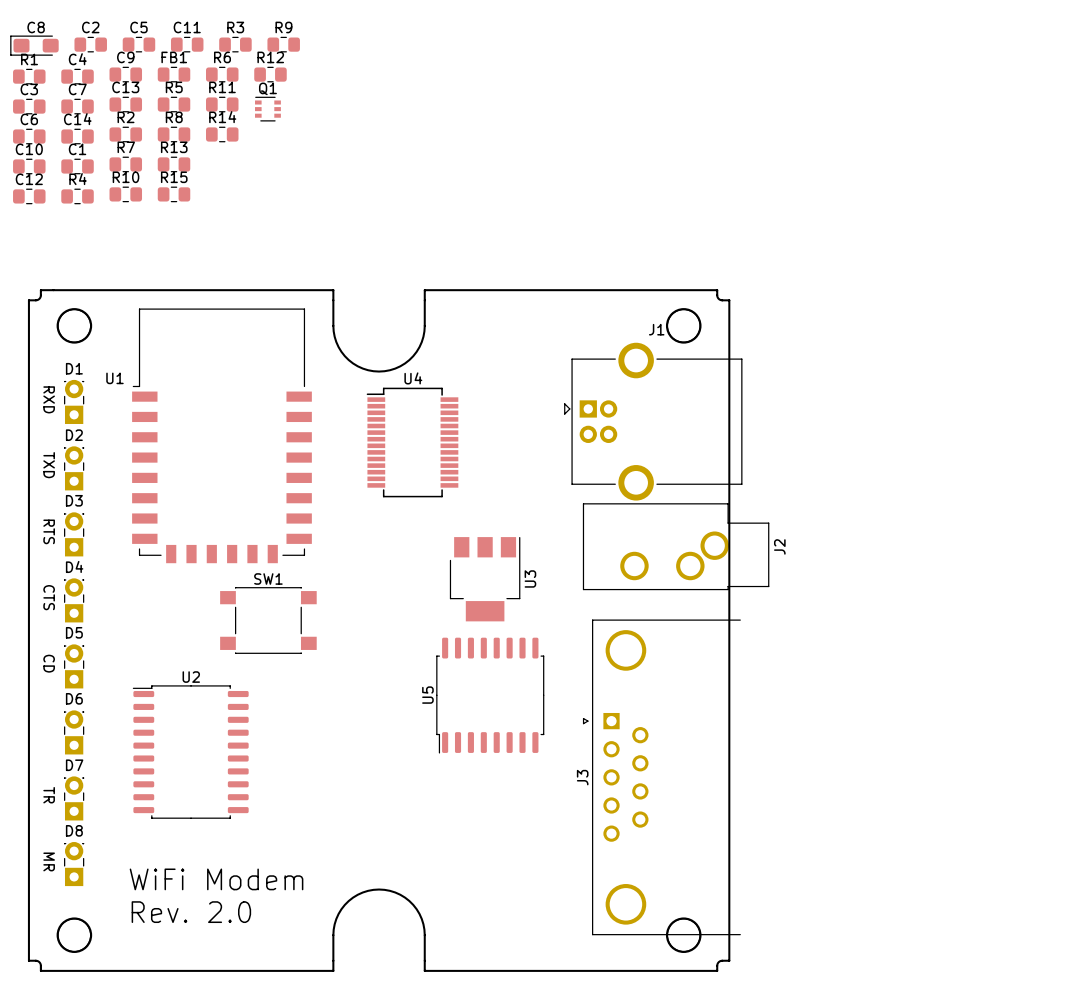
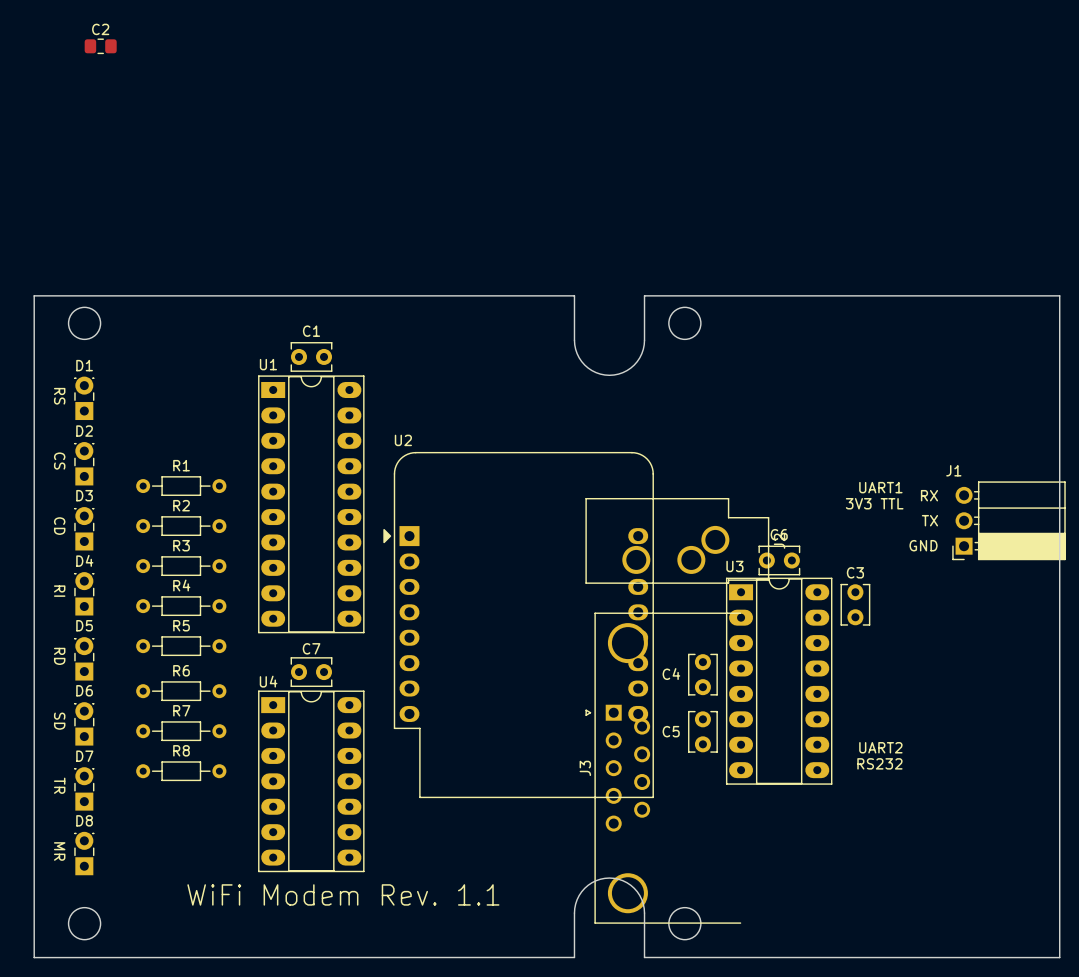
C5 name position: C5 (138, 27) -> C5 (671, 731)
C5 footprint: [122, 36, 156, 53] -> [688, 711, 718, 753]
R3 footprint: [219, 36, 252, 53] -> [136, 556, 227, 576]
C11: (187, 44) -> none
R9: (283, 44) -> none
C8: (34, 45) -> none
C4 name position: C4 (77, 59) -> C4 (671, 674)
R6 footprint: [206, 66, 239, 83] -> [136, 681, 227, 701]
R1 footprint: [13, 68, 46, 85] -> [136, 476, 227, 496]
C4 footprint: [61, 68, 94, 85] -> [688, 653, 718, 696]
C9: (125, 74) -> none
FB1: (174, 74) -> none
R12: (270, 74) -> none
R5 footprint: [157, 96, 191, 113] -> [136, 636, 227, 656]
C3 footprint: [13, 98, 46, 115] -> [840, 583, 871, 626]
C7 footprint: [61, 98, 94, 115] -> [290, 657, 333, 687]
C13: (125, 104) -> none
R11: (222, 104) -> none
Q1: (267, 109) -> none
R2 footprint: [109, 126, 143, 143] -> [136, 516, 227, 536]
R8 footprint: [157, 126, 191, 143] -> [136, 761, 227, 782]
C6 footprint: [13, 128, 46, 145] -> [758, 545, 801, 576]
R14: (222, 134) -> none
C14: (77, 136) -> none
R7 footprint: [109, 156, 143, 173] -> [136, 721, 227, 741]
C1 footprint: [61, 158, 94, 175] -> [290, 342, 333, 372]
R13: (174, 164) -> none
C10: (29, 166) -> none
R4 footprint: [61, 188, 94, 205] -> [136, 596, 227, 616]
R10: (125, 194) -> none
R15: (174, 194) -> none
C12: (29, 196) -> none
board edge: (40, 290) (333, 290) (333, 331) (338, 347) (344, 356) (357, 366) (379, 371) (400, 366) (409, 360) (419, 347) (424, 331) (424, 290) (717, 290) (719, 299) (729, 300) (729, 960) (719, 961) (717, 970) (424, 970) (424, 929) (419, 913) (405, 897) (389, 890) (379, 889) (362, 892) (353, 897) (338, 913) (333, 929) (333, 970) (40, 970) (38, 961) (28, 960) (28, 300) (38, 299) (40, 290) -> (34, 295) (34, 957) (574, 957) (574, 913) (577, 899) (588, 885) (600, 879) (609, 878) (627, 882) (634, 888) (641, 899) (644, 913) (644, 957) (1059, 957) (1059, 295) (644, 295) (644, 340) (641, 353) (634, 365) (627, 370) (609, 375) (596, 372) (588, 368) (577, 353) (574, 340) (574, 295) (34, 295)
round board edge: [56, 308, 93, 344] -> none
U1 footprint: [132, 308, 312, 564] -> [258, 375, 365, 634]
round board edge: [665, 308, 702, 344] -> none
J1 name position: J1 (656, 329) -> J1 (953, 470)
J1 footprint: [564, 342, 743, 501] -> [952, 481, 1066, 561]
U1 name position: U1 (114, 378) -> U1 (268, 364)
U4 name position: U4 (413, 378) -> U4 (268, 681)
U4 footprint: [366, 387, 459, 498] -> [258, 690, 365, 873]
text: RXD (49, 399) -> RS (59, 396)
text: TXD (49, 465) -> CS (59, 461)
text: none -> UART1 (880, 487)
text: none -> RX (929, 495)
text: none -> 3V3 TTL (874, 503)
text: none -> TX (929, 520)
text: RTS (49, 531) -> CD (59, 526)
U3 footprint: [449, 536, 521, 622] -> [726, 577, 833, 785]
text: none -> GND (923, 545)
U3 name position: U3 (530, 578) -> U3 (734, 566)
text: CTS (49, 597) -> RI (59, 591)
SW1: (268, 620) -> none
text: CD (49, 663) -> RD (59, 656)
U2 name position: U2 (191, 677) -> U2 (403, 440)
U2 footprint: [132, 685, 249, 819] -> [383, 452, 654, 799]
U5: (490, 695) -> none
text: none -> SD (59, 721)
text: none -> UART2 (880, 747)
text: none -> RS232 (879, 763)
text: WiFi Modem (216, 879) -> WiFi Modem Rev. 1.1 (343, 894)
text: Rev. 2.0 (191, 912) -> none
round board edge: [56, 917, 93, 953] -> none
round board edge: [665, 917, 702, 953] -> none

